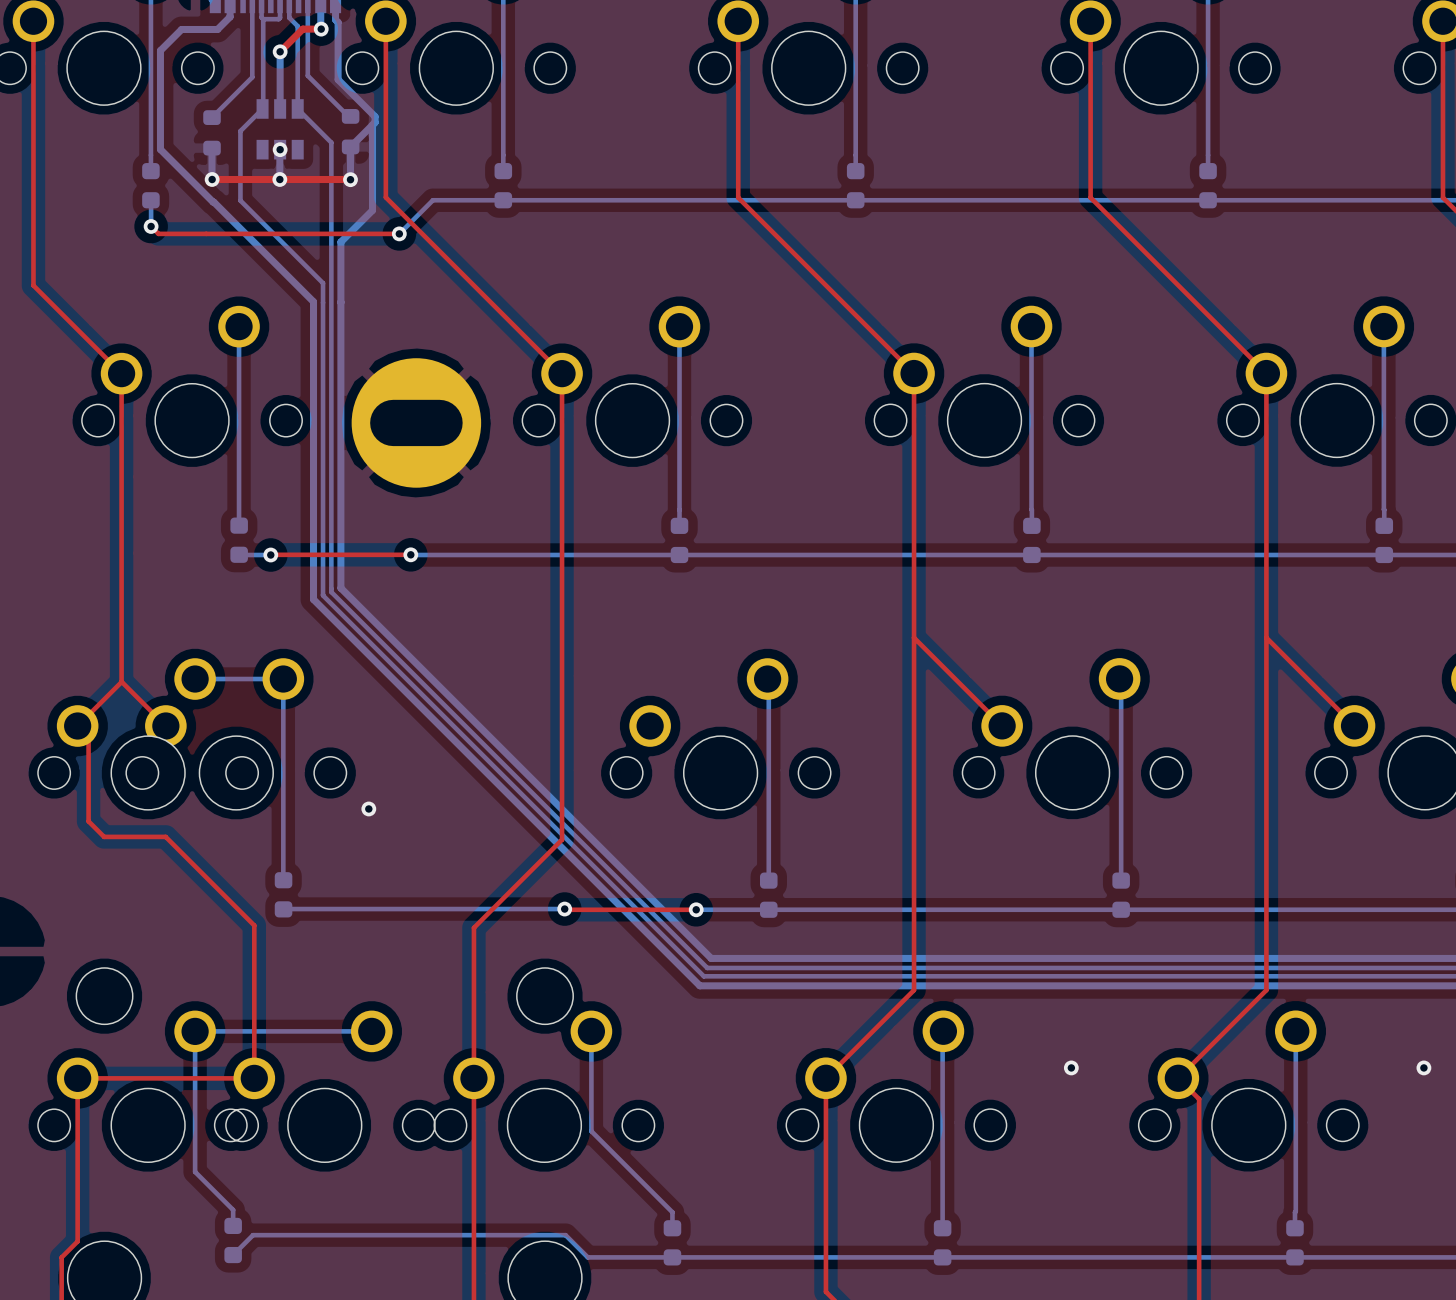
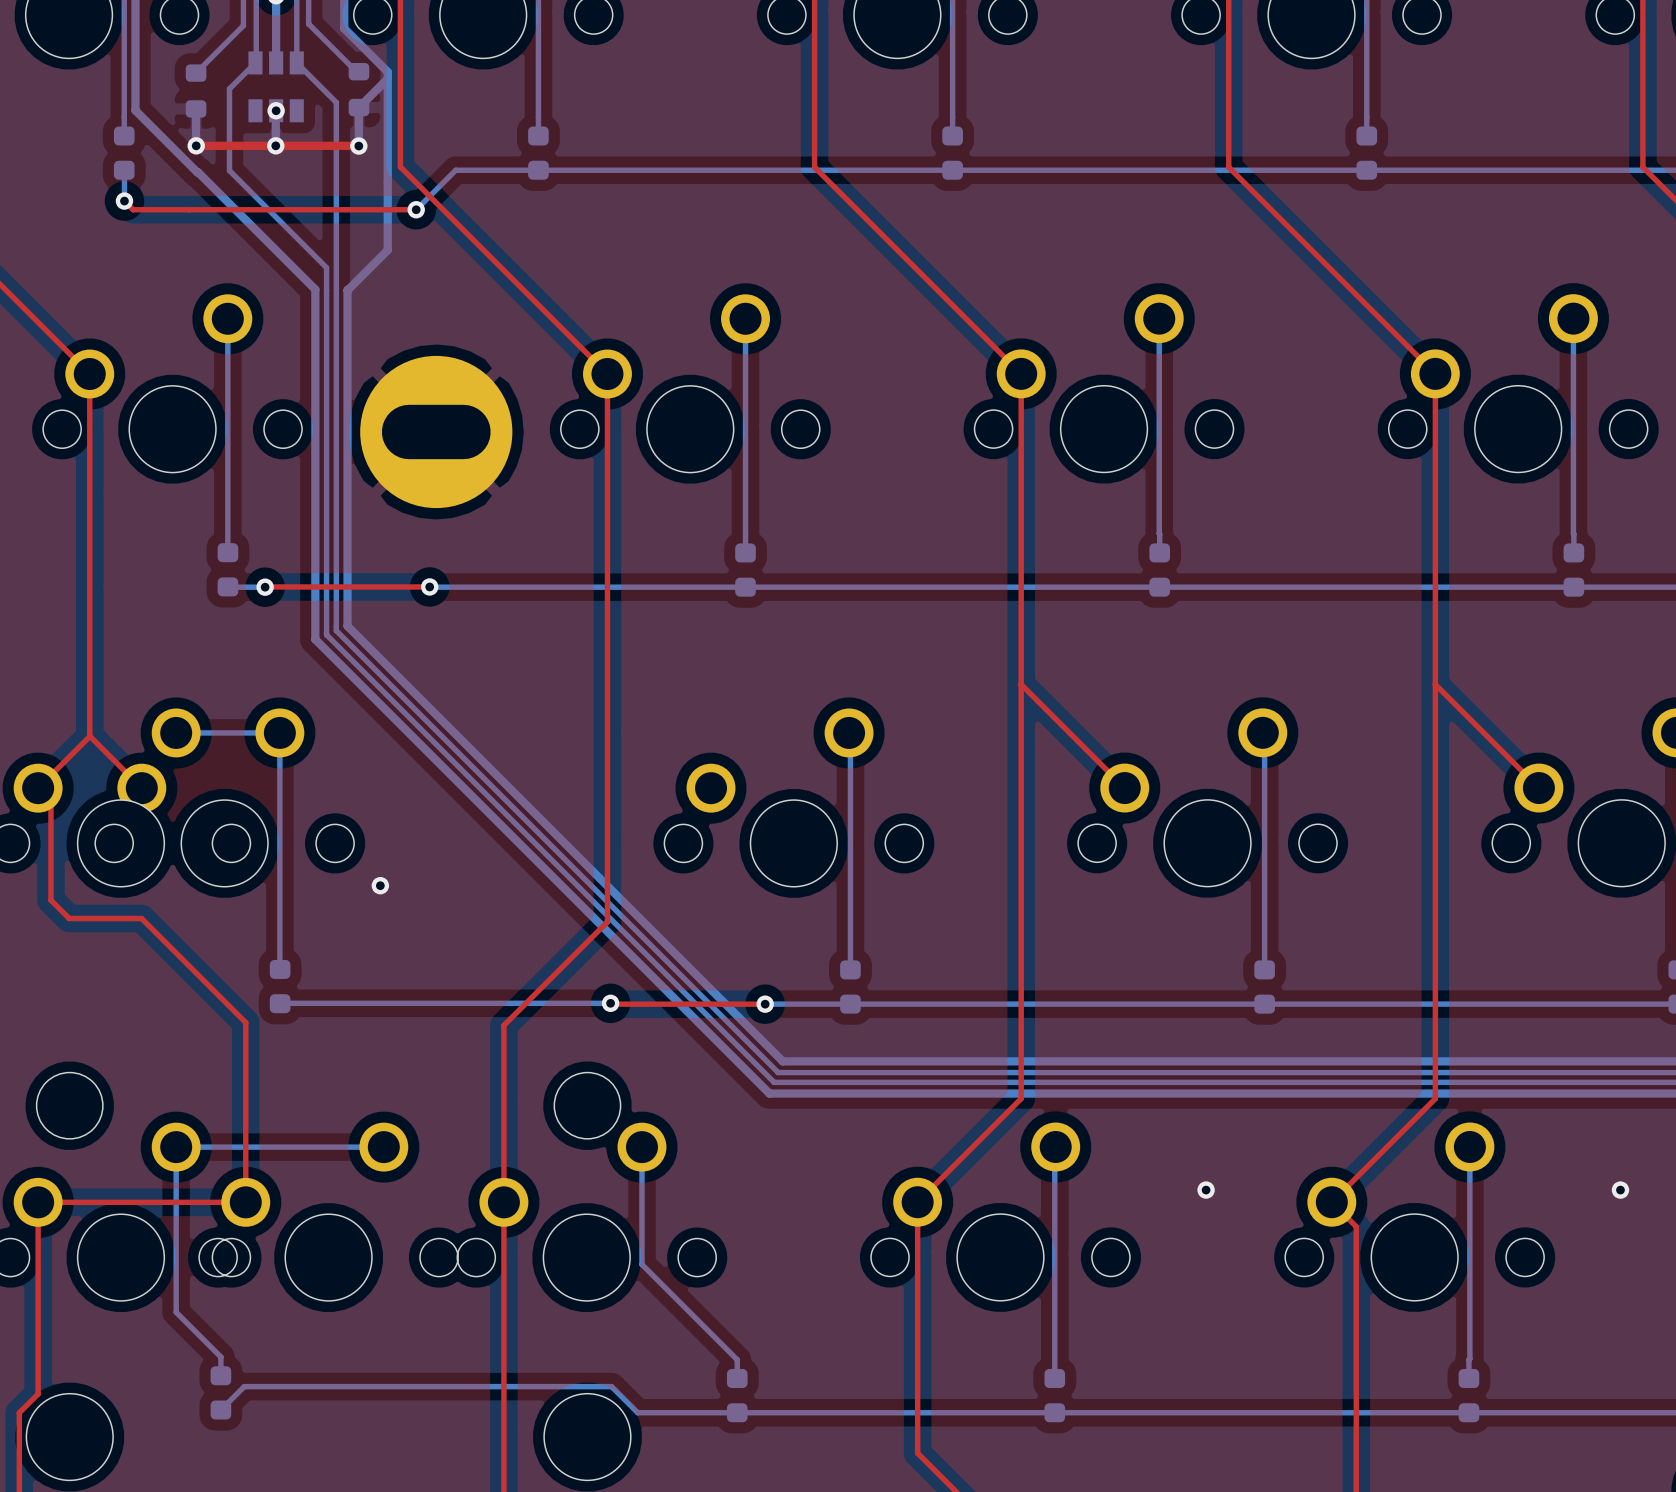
bottom track: (372, 125) (372, 210) (340, 242) (340, 302) -> (387, 78) (387, 250) (347, 290)

